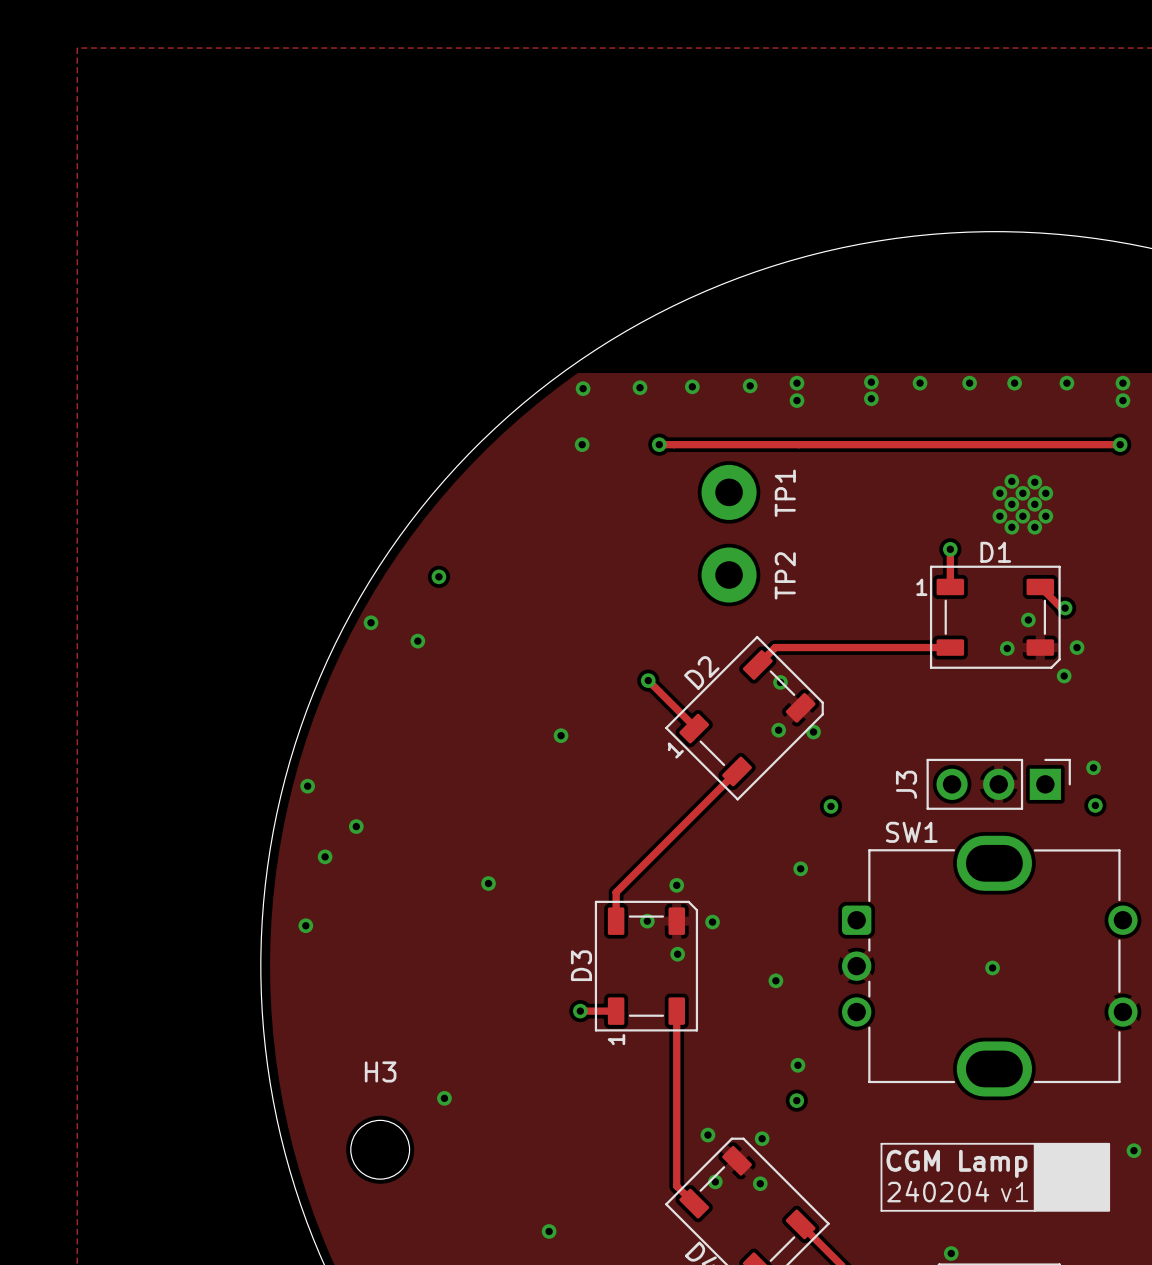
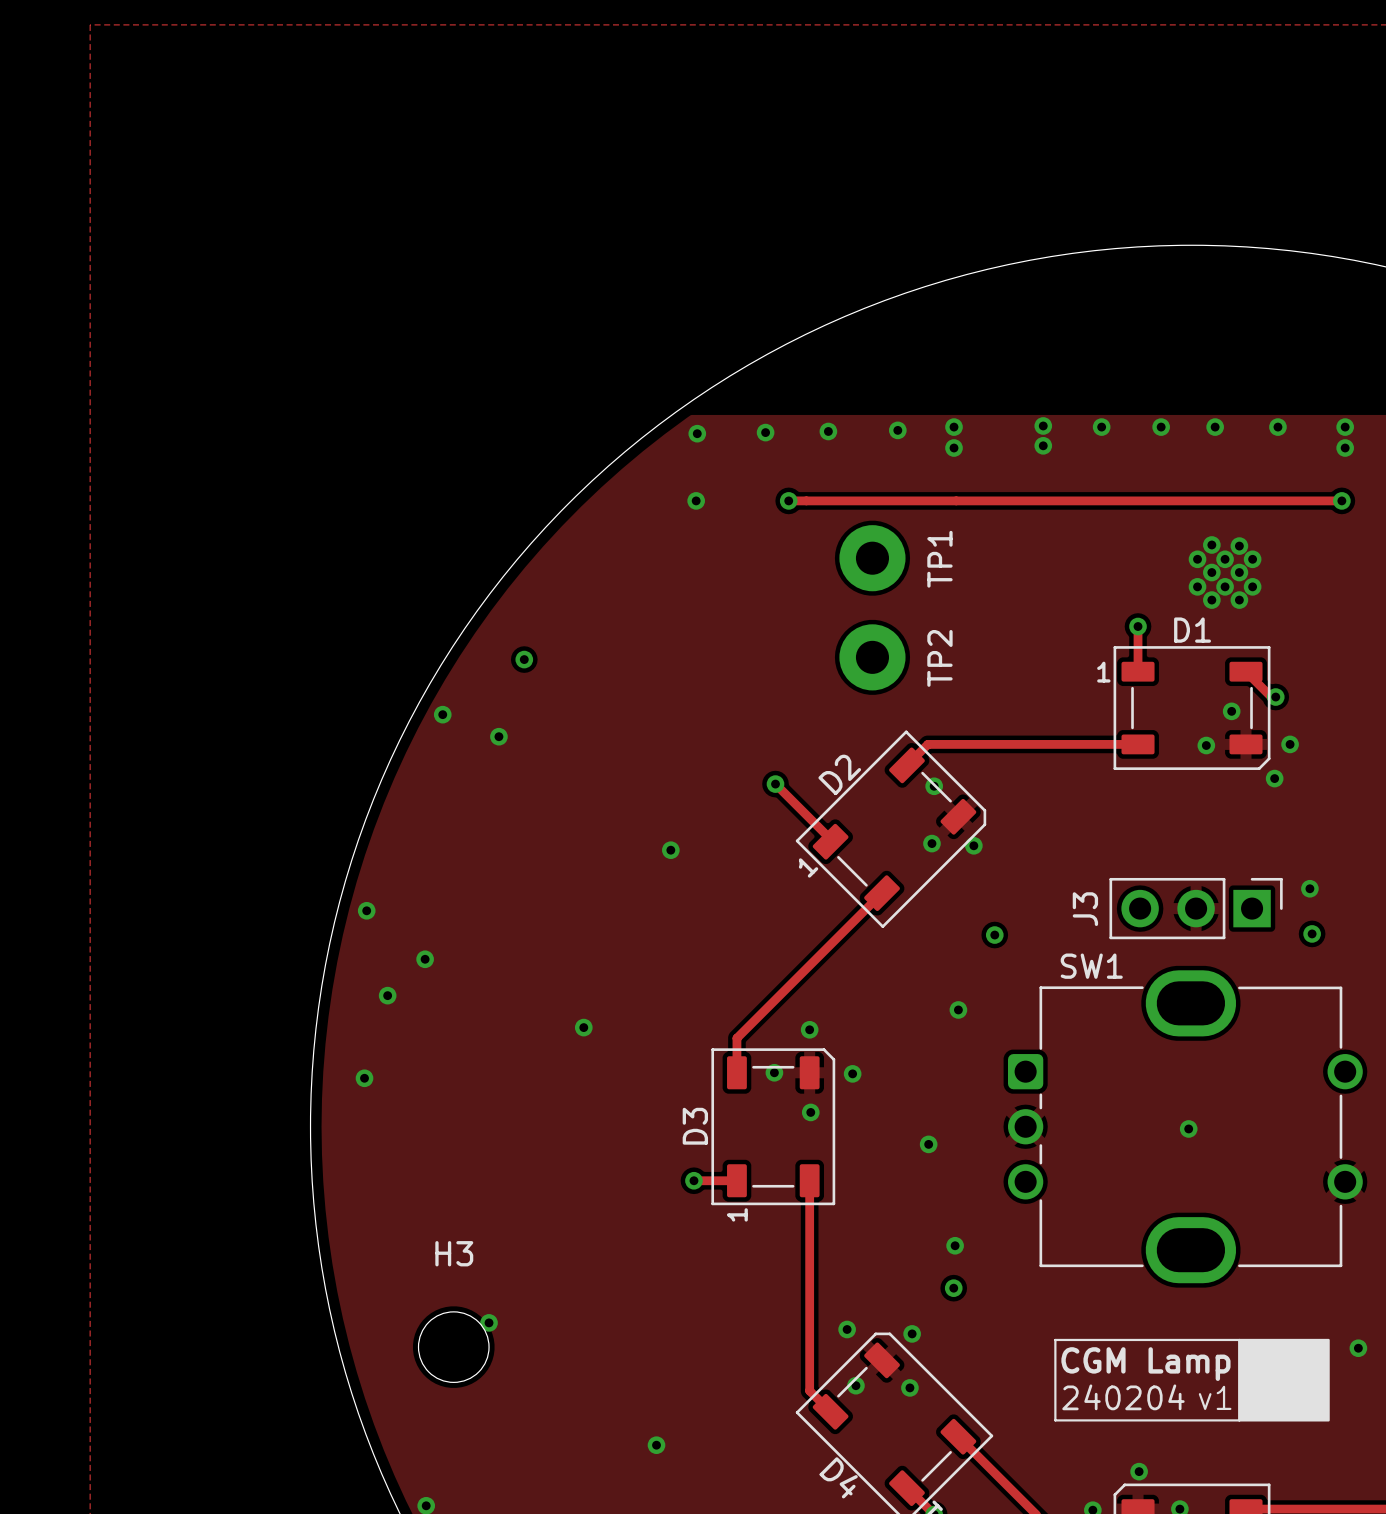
via position: (444, 1098) -> (489, 1322)

